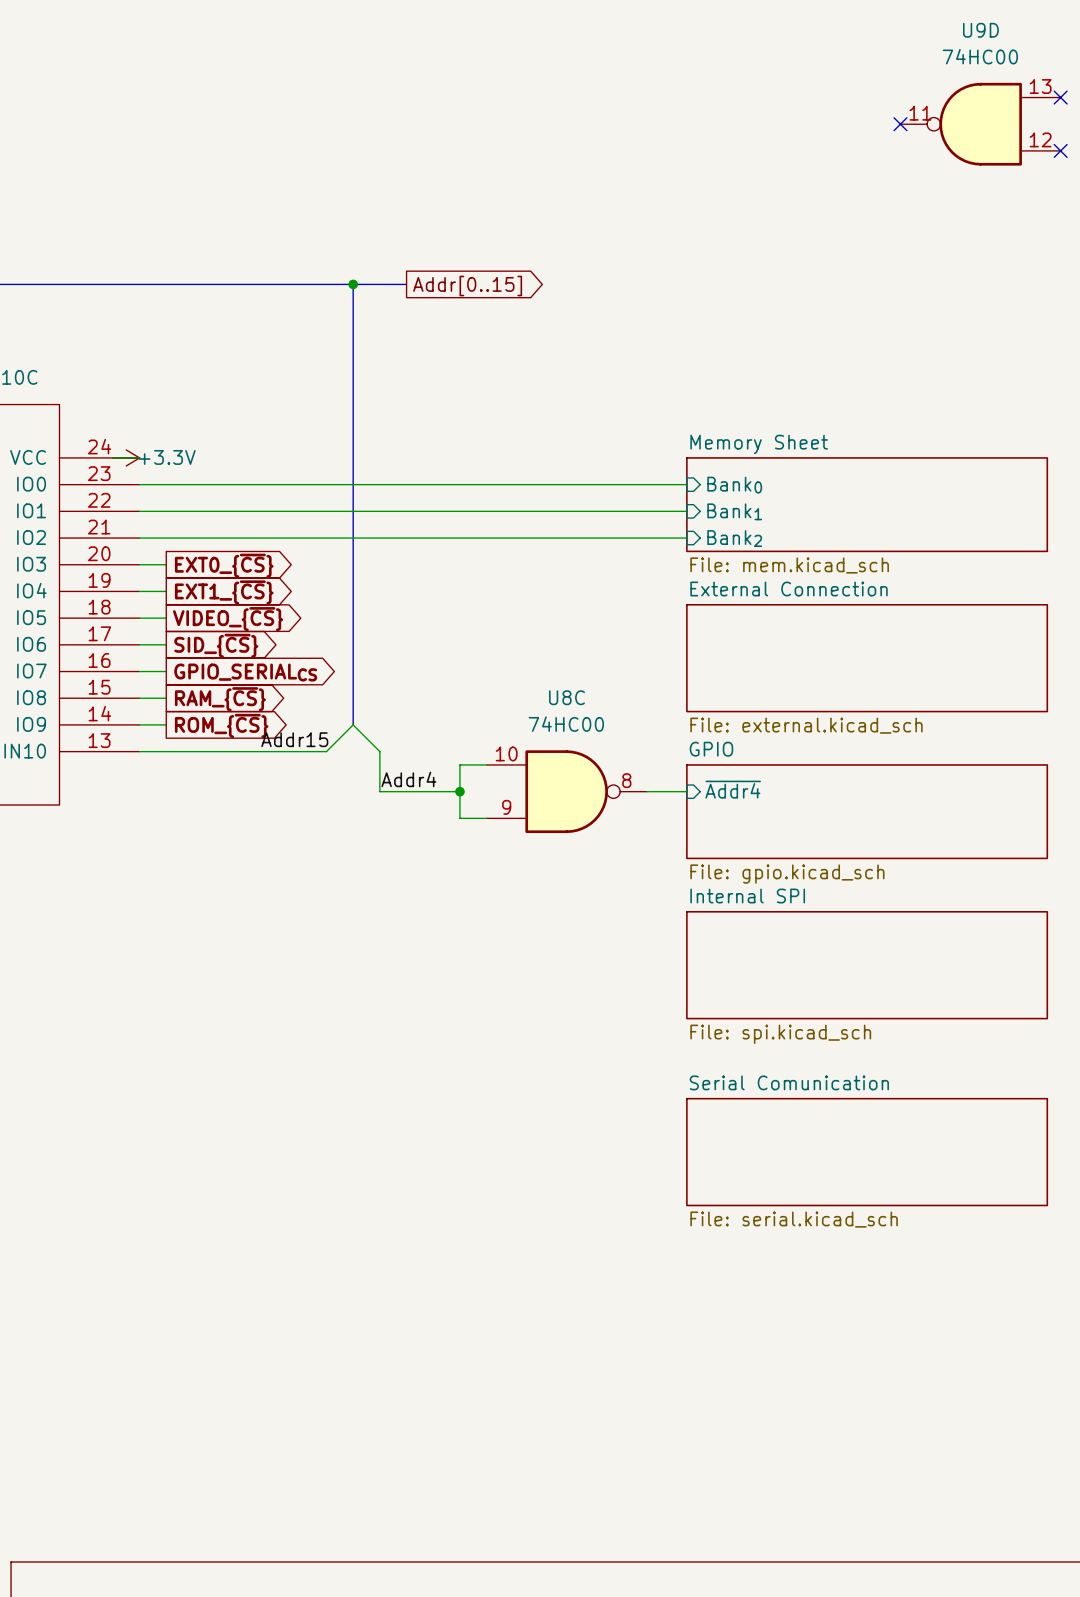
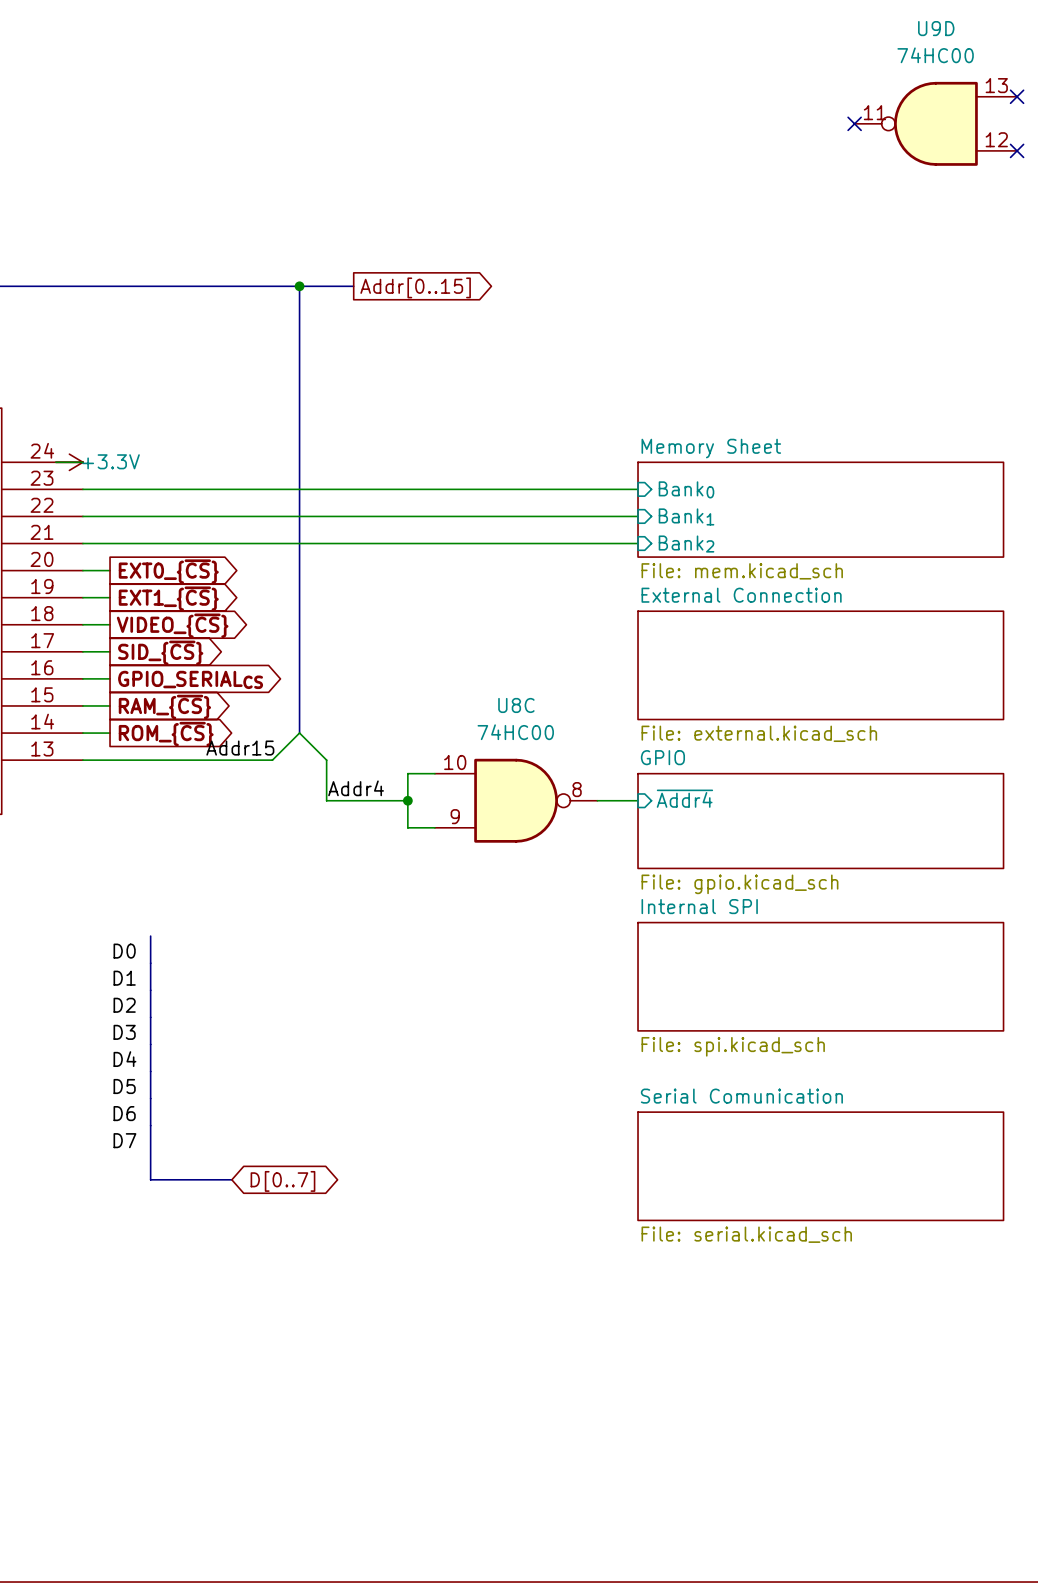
bus: none -> (150, 936) (150, 1179) (231, 1179)
label: none -> D0 (124, 951)
label: none -> D1 (124, 978)
label: none -> D2 (124, 1005)
label: none -> D3 (124, 1032)
label: none -> D4 (124, 1059)
label: none -> D5 (124, 1086)
label: none -> D6 (124, 1113)
label: none -> D7 (124, 1140)
global label: none -> D[0..7] (282, 1181)

